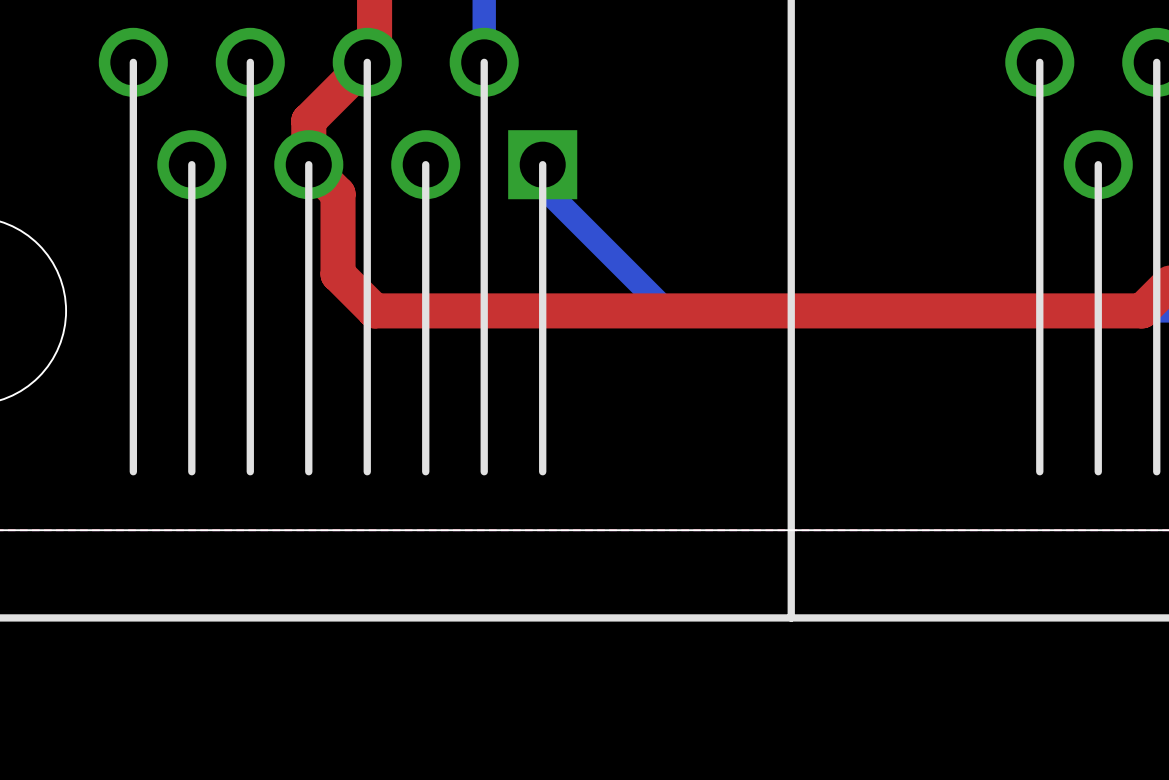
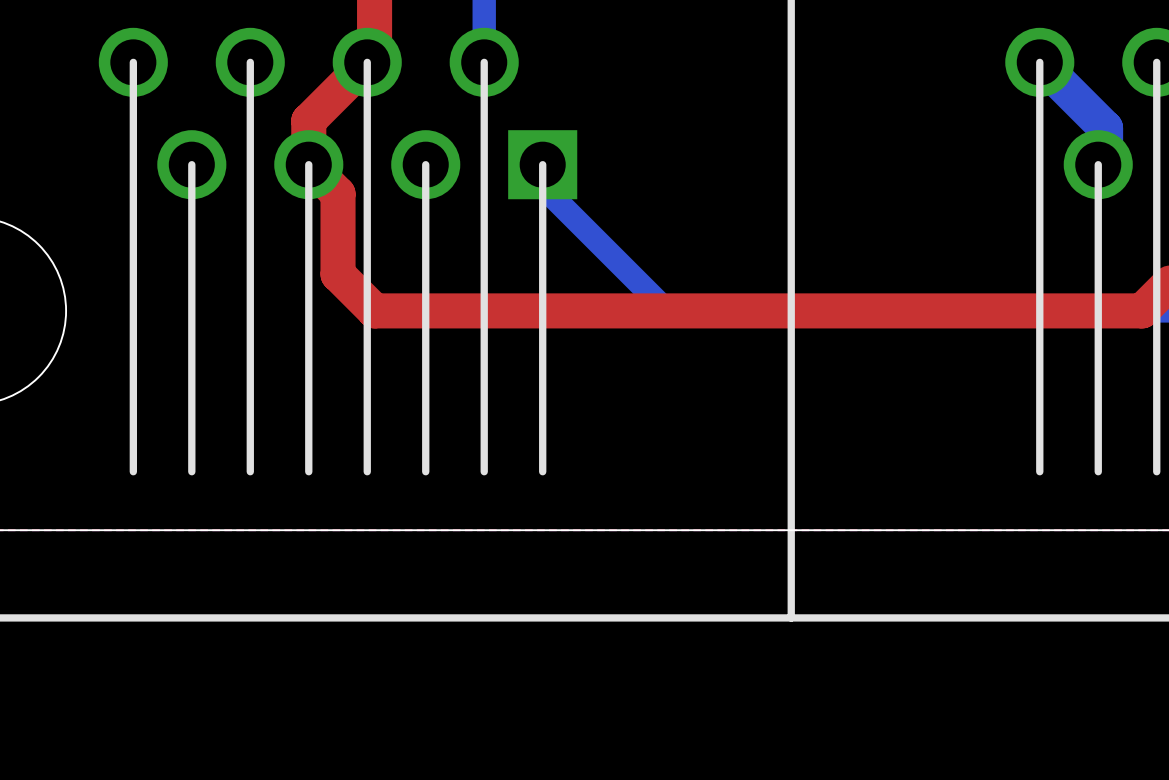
bottom track: none -> (1039, 62) (1105, 128) (1105, 164) (1098, 164)

